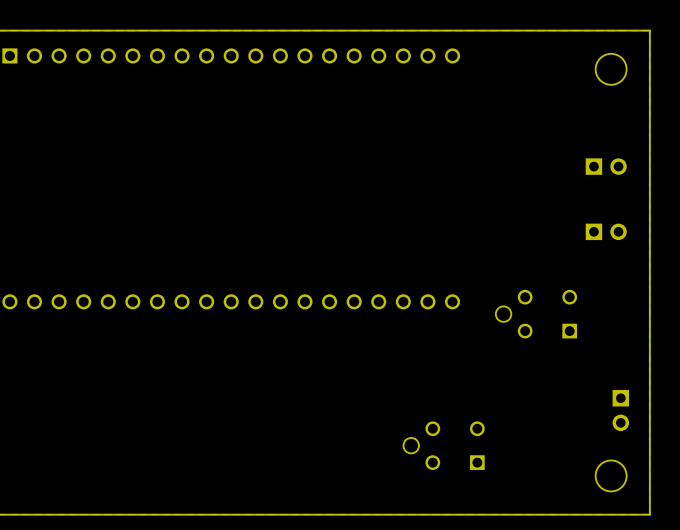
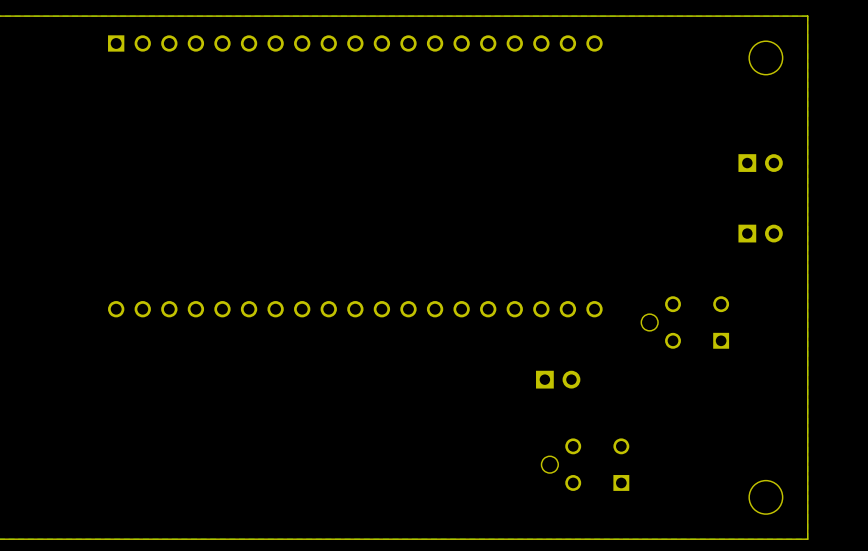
part rotation: 0° (620, 410) -> 90° counterclockwise (558, 379)
part position: (620, 410) -> (558, 379)

